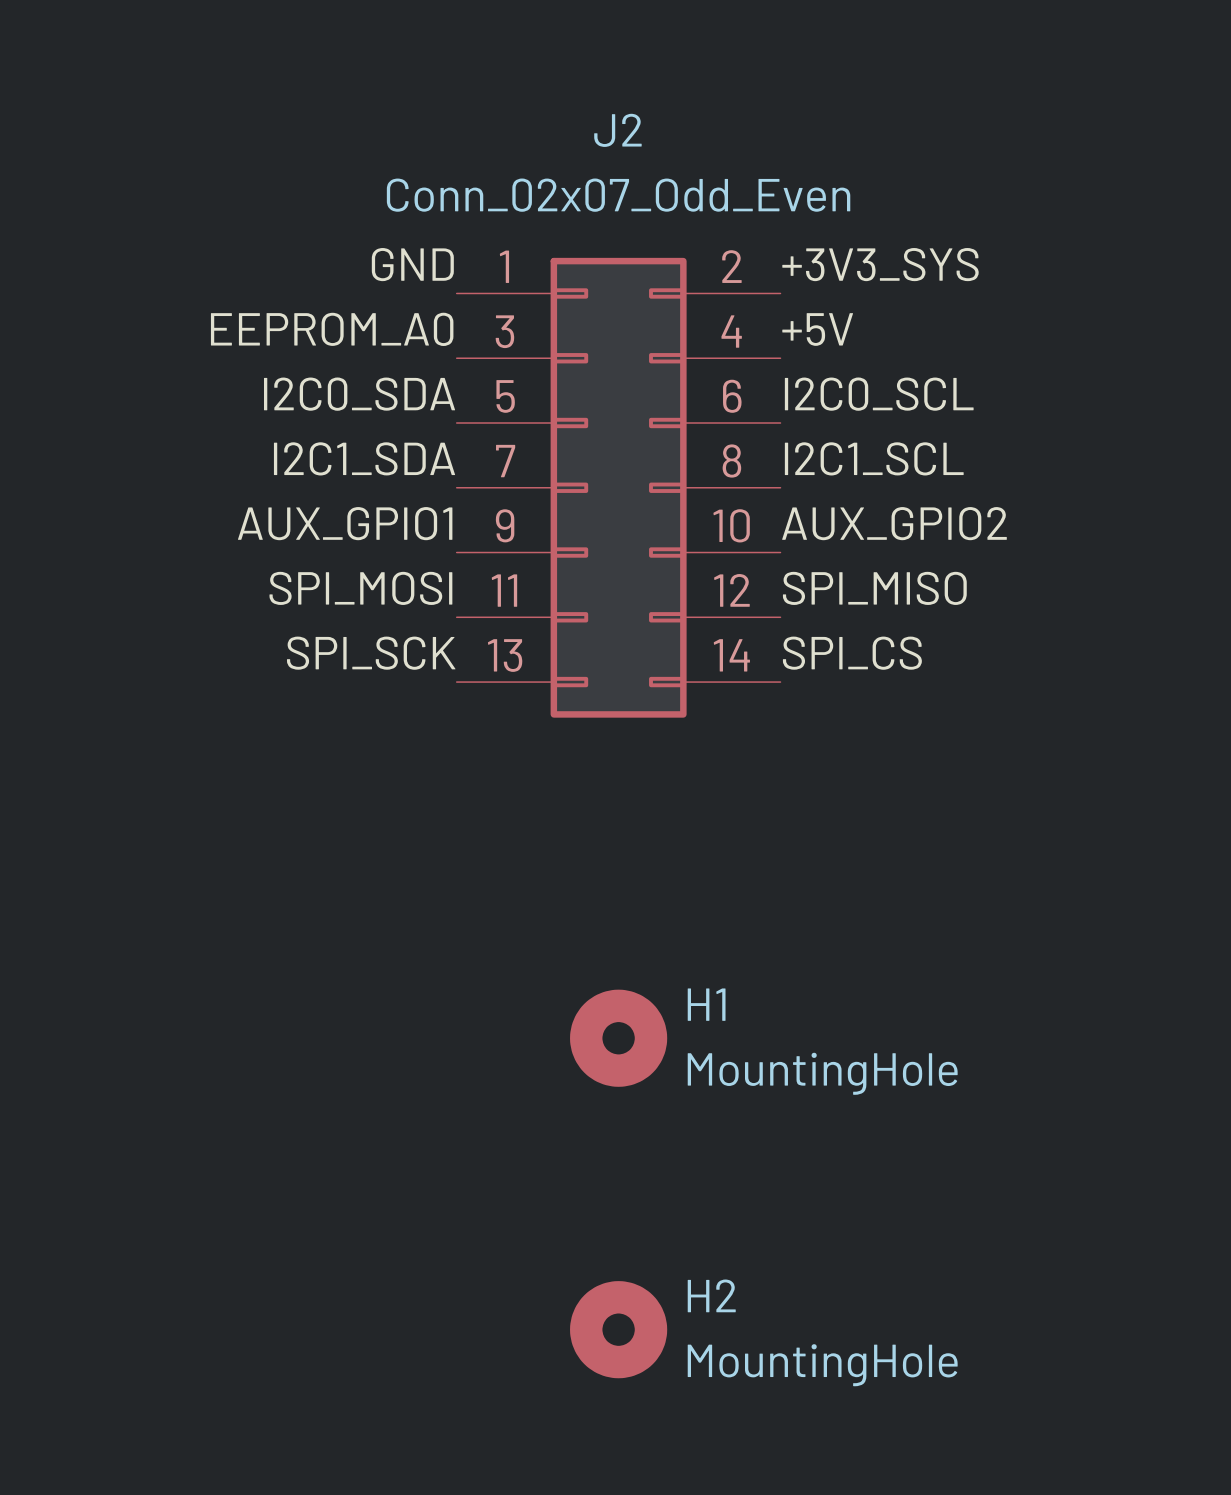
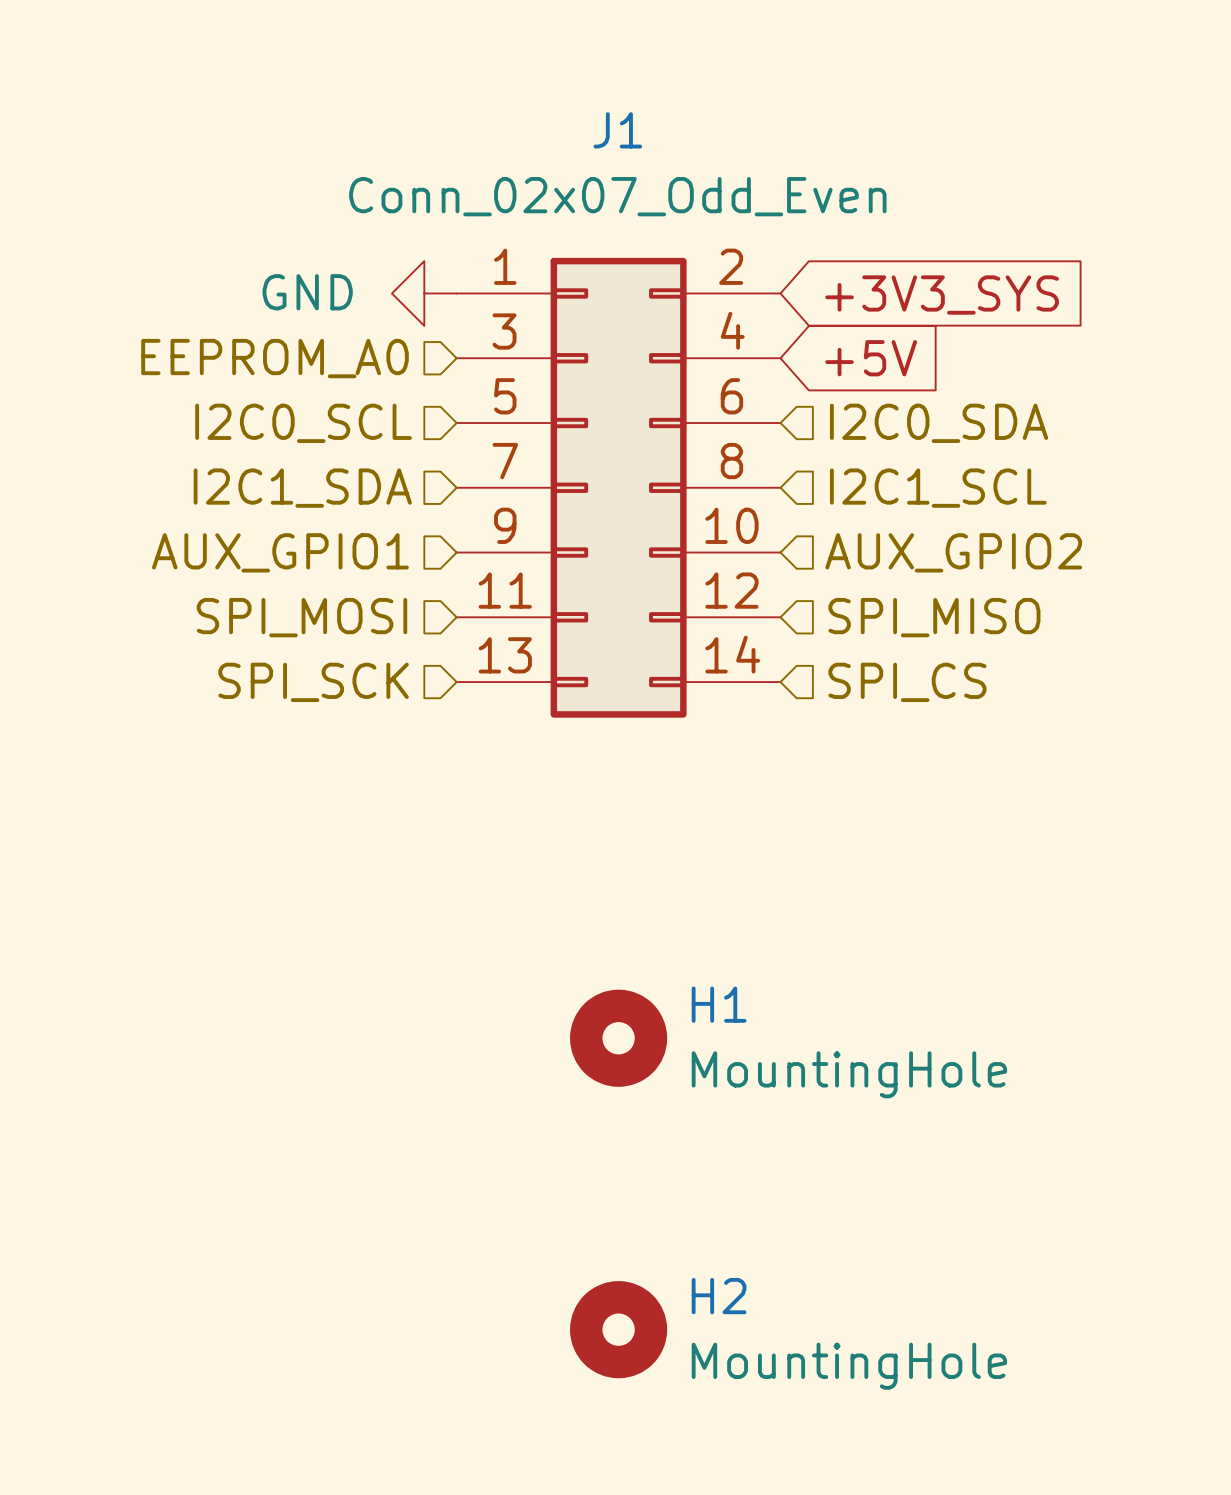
J2 name: J2 (617, 130) -> J1 (617, 130)
label: GND (412, 264) -> none
label: +3V3_SYS (880, 264) -> none
power symbol: none -> GND (424, 293)
global label: none -> +3V3_SYS (942, 295)
label: EEPROM_A0 (332, 329) -> none
label: +5V (817, 329) -> none
hierarchical label: none -> EEPROM_A0 (275, 358)
global label: none -> +5V (871, 358)
label: I2C0_SDA (359, 394) -> none
label: I2C0_SCL (879, 394) -> none
hierarchical label: none -> I2C0_SCL (303, 423)
hierarchical label: none -> I2C0_SDA (939, 423)
label: I2C1_SDA (364, 458) -> none
label: I2C1_SCL (874, 458) -> none
hierarchical label: none -> I2C1_SDA (302, 488)
hierarchical label: none -> I2C1_SCL (938, 488)
label: AUX_GPIO1 (345, 523) -> none
label: AUX_GPIO2 (894, 523) -> none
hierarchical label: none -> AUX_GPIO1 (280, 552)
hierarchical label: none -> AUX_GPIO2 (953, 552)
label: SPI_MOSI (360, 588) -> none
label: SPI_MISO (874, 588) -> none
hierarchical label: none -> SPI_MOSI (302, 617)
hierarchical label: none -> SPI_MISO (934, 617)
label: SPI_SCK (371, 653) -> none
label: SPI_CS (852, 653) -> none
hierarchical label: none -> SPI_SCK (313, 682)
hierarchical label: none -> SPI_CS (907, 682)

